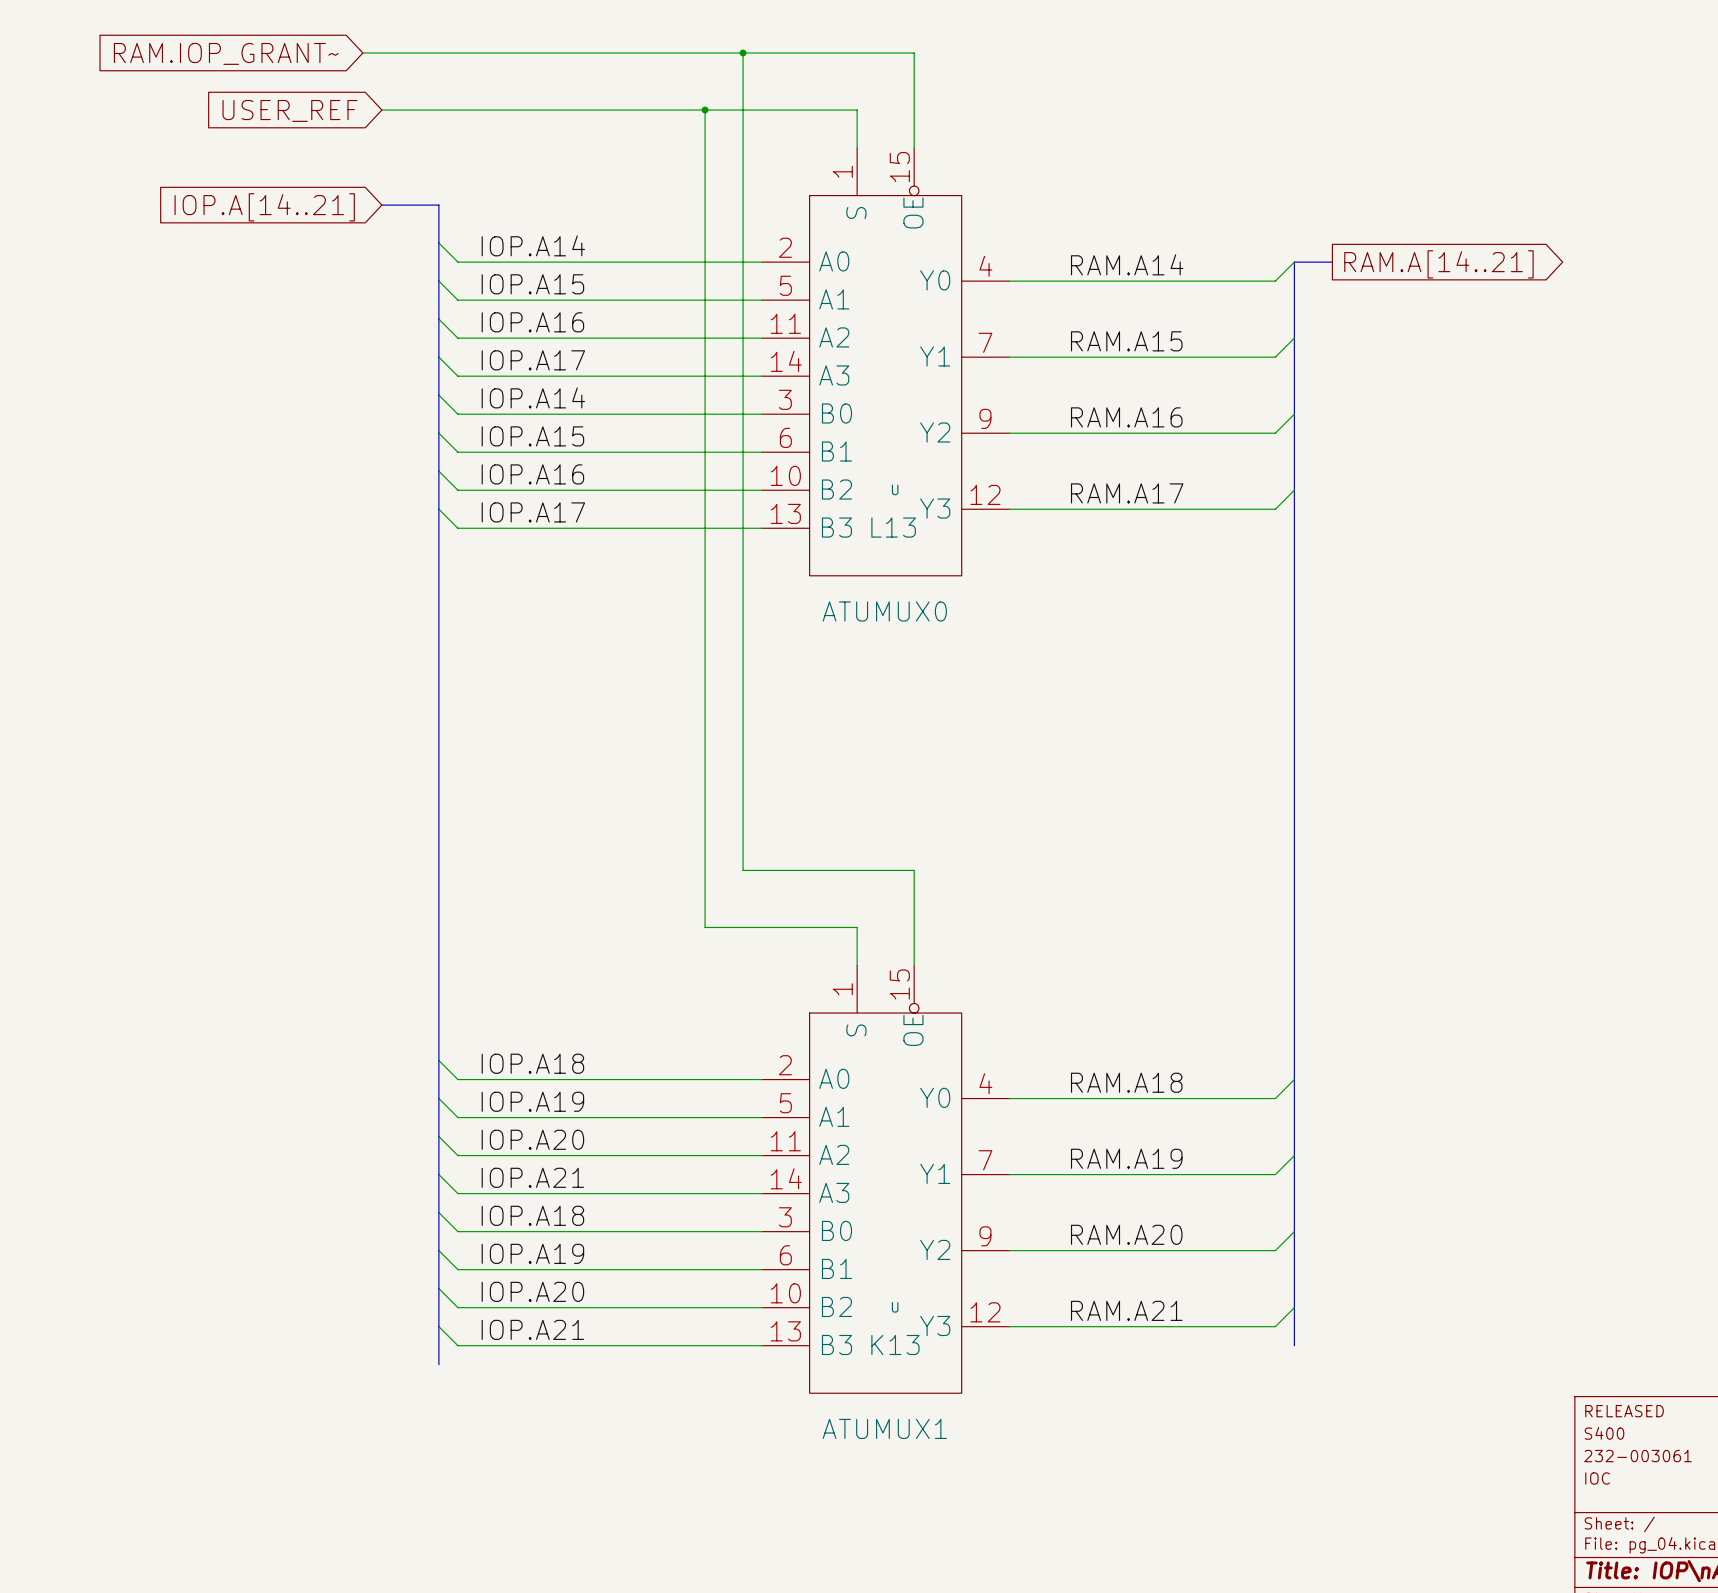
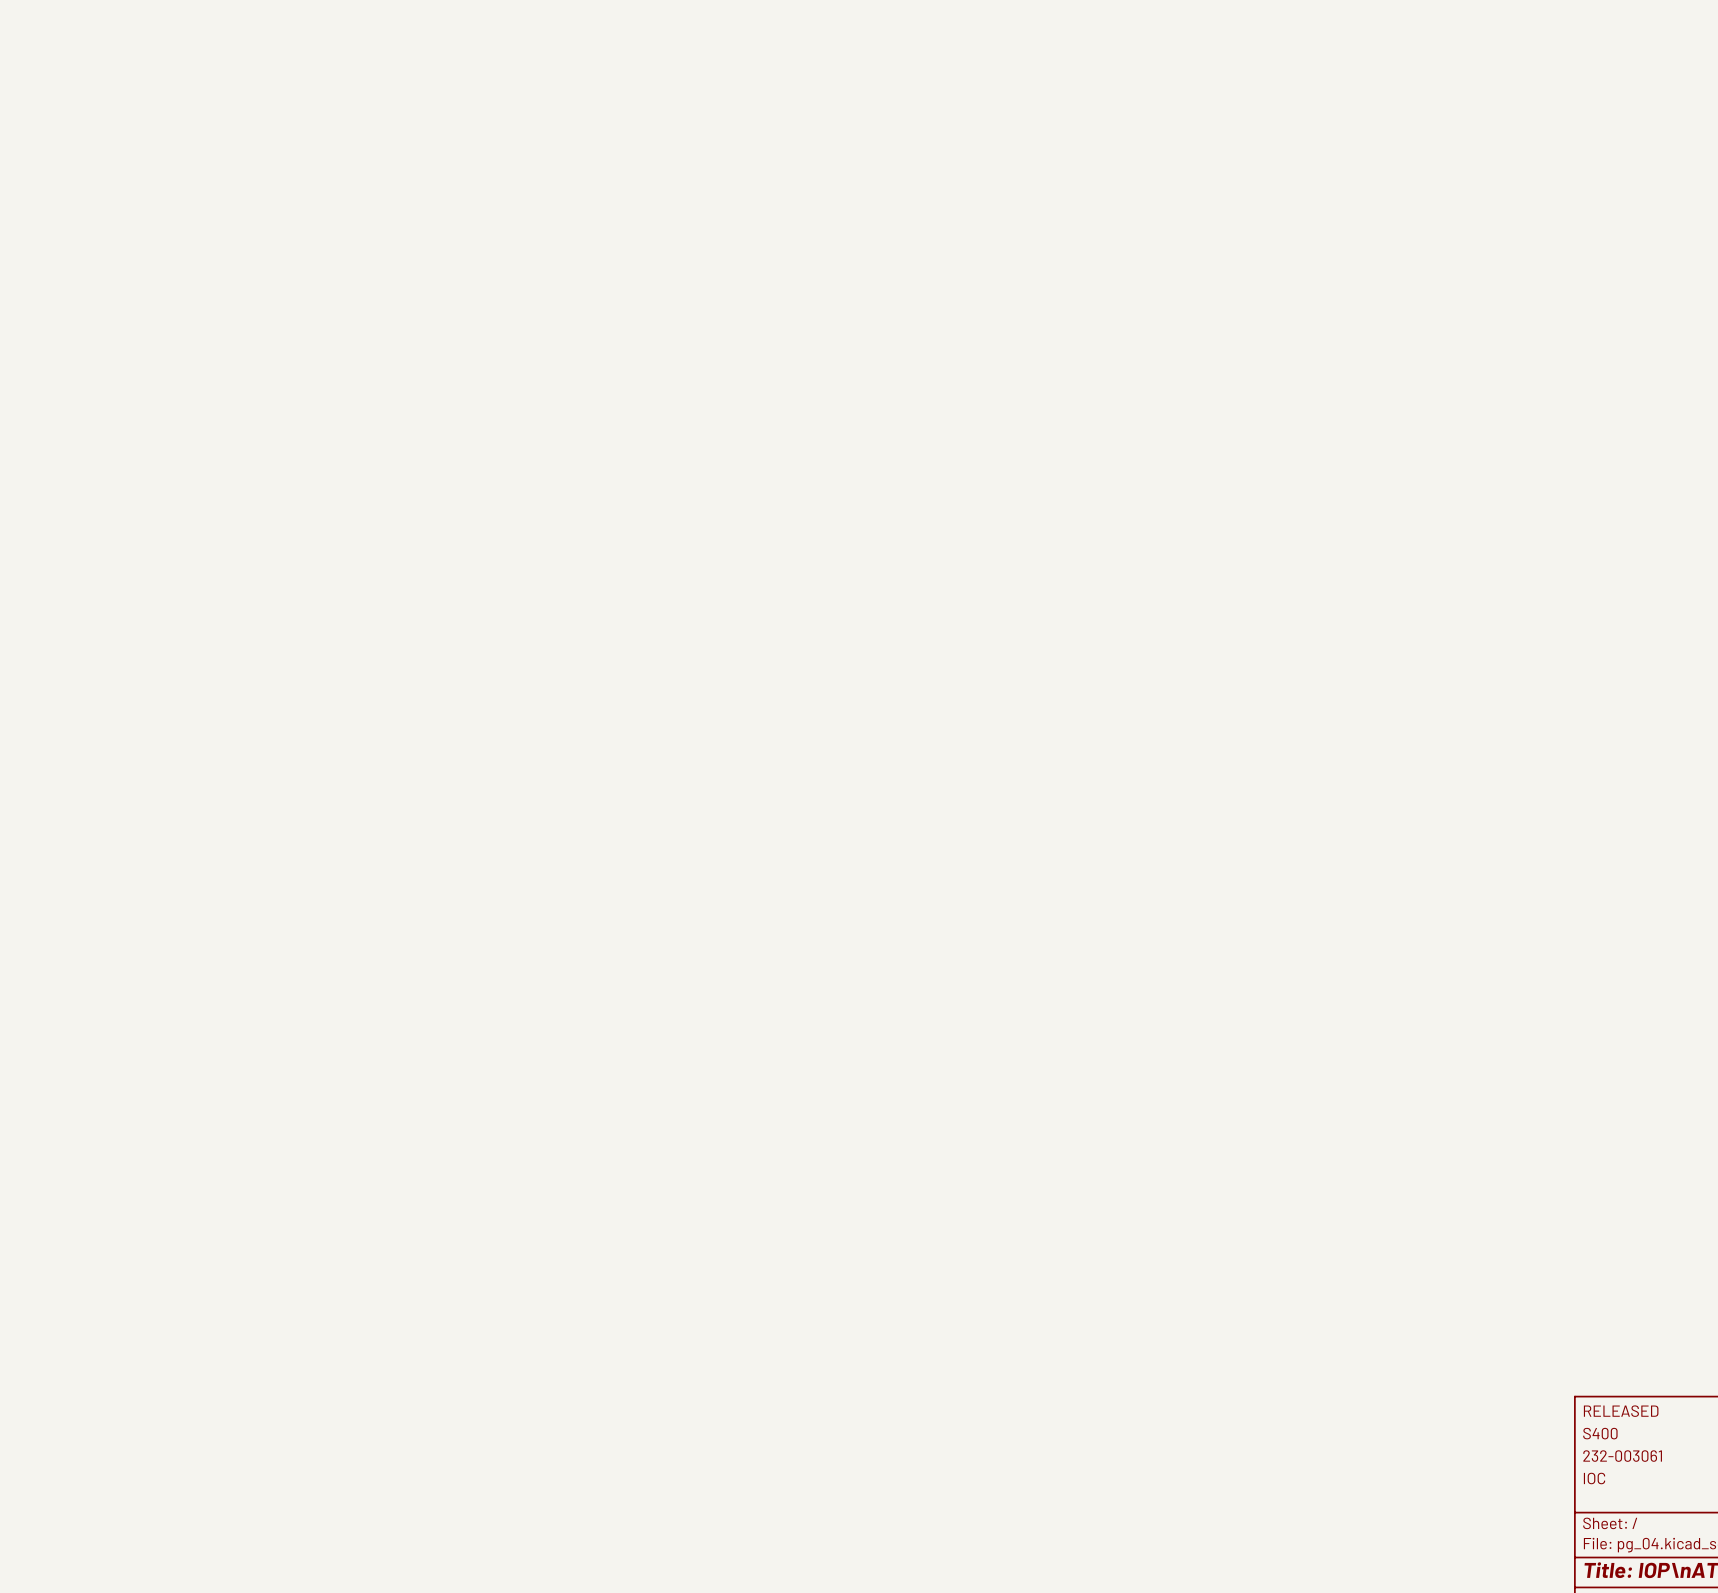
global label: RAM.IOP_GRANT~ (226, 53) -> none
wire: (362, 53) (914, 53) (914, 148) -> none
wire: (743, 53) (743, 870) (914, 870) (914, 965) -> none
junction: (743, 53) -> none
global label: USER_REF (290, 110) -> none
wire: (381, 110) (857, 110) (857, 148) -> none
wire: (705, 110) (705, 927) (857, 927) (857, 965) -> none
junction: (705, 110) -> none
bus: (381, 205) (438, 205) (438, 1364) -> none
global label: IOP.A[14..21] (264, 207) -> none
wire: (438, 243) (457, 262) (762, 262) -> none
label: IOP.A14 (533, 245) -> none
wire: (1294, 262) (1275, 281) (1009, 281) -> none
bus: (1332, 262) (1294, 262) (1294, 1345) -> none
label: RAM.A14 (1127, 264) -> none
global label: RAM.A[14..21] (1438, 264) -> none
wire: (438, 281) (457, 300) (762, 300) -> none
label: IOP.A15 (532, 284) -> none
wire: (438, 319) (457, 338) (762, 338) -> none
label: IOP.A16 (532, 322) -> none
wire: (1294, 338) (1275, 357) (1009, 357) -> none
label: RAM.A15 (1126, 341) -> none
wire: (438, 357) (457, 376) (762, 376) -> none
label: IOP.A17 (533, 360) -> none
U: (885, 361) -> none
wire: (438, 395) (457, 414) (762, 414) -> none
label: IOP.A14 (533, 397) -> none
wire: (1294, 414) (1275, 433) (1009, 433) -> none
label: RAM.A16 (1126, 417) -> none
wire: (438, 433) (457, 452) (762, 452) -> none
label: IOP.A15 (532, 436) -> none
wire: (438, 471) (457, 490) (762, 490) -> none
label: IOP.A16 (532, 474) -> none
wire: (1294, 490) (1275, 509) (1009, 509) -> none
label: RAM.A17 (1127, 493) -> none
wire: (438, 509) (457, 528) (762, 528) -> none
label: IOP.A17 (533, 512) -> none
wire: (438, 1060) (457, 1079) (762, 1079) -> none
label: IOP.A18 (532, 1063) -> none
wire: (1294, 1079) (1275, 1098) (1009, 1098) -> none
label: RAM.A18 (1126, 1082) -> none
wire: (438, 1098) (457, 1117) (762, 1117) -> none
label: IOP.A19 (532, 1101) -> none
wire: (438, 1136) (457, 1155) (762, 1155) -> none
label: IOP.A20 (532, 1139) -> none
wire: (1294, 1155) (1275, 1174) (1009, 1174) -> none
label: RAM.A19 (1126, 1158) -> none
wire: (438, 1174) (457, 1193) (762, 1193) -> none
label: IOP.A21 (532, 1177) -> none
U: (885, 1179) -> none
wire: (438, 1212) (457, 1231) (762, 1231) -> none
label: IOP.A18 (532, 1215) -> none
wire: (1294, 1231) (1275, 1250) (1009, 1250) -> none
label: RAM.A20 (1126, 1234) -> none
wire: (438, 1250) (457, 1269) (762, 1269) -> none
label: IOP.A19 (532, 1253) -> none
wire: (438, 1288) (457, 1307) (762, 1307) -> none
label: IOP.A20 (532, 1291) -> none
wire: (1294, 1307) (1275, 1326) (1009, 1326) -> none
label: RAM.A21 (1126, 1310) -> none
wire: (438, 1326) (457, 1345) (762, 1345) -> none
label: IOP.A21 (532, 1329) -> none

